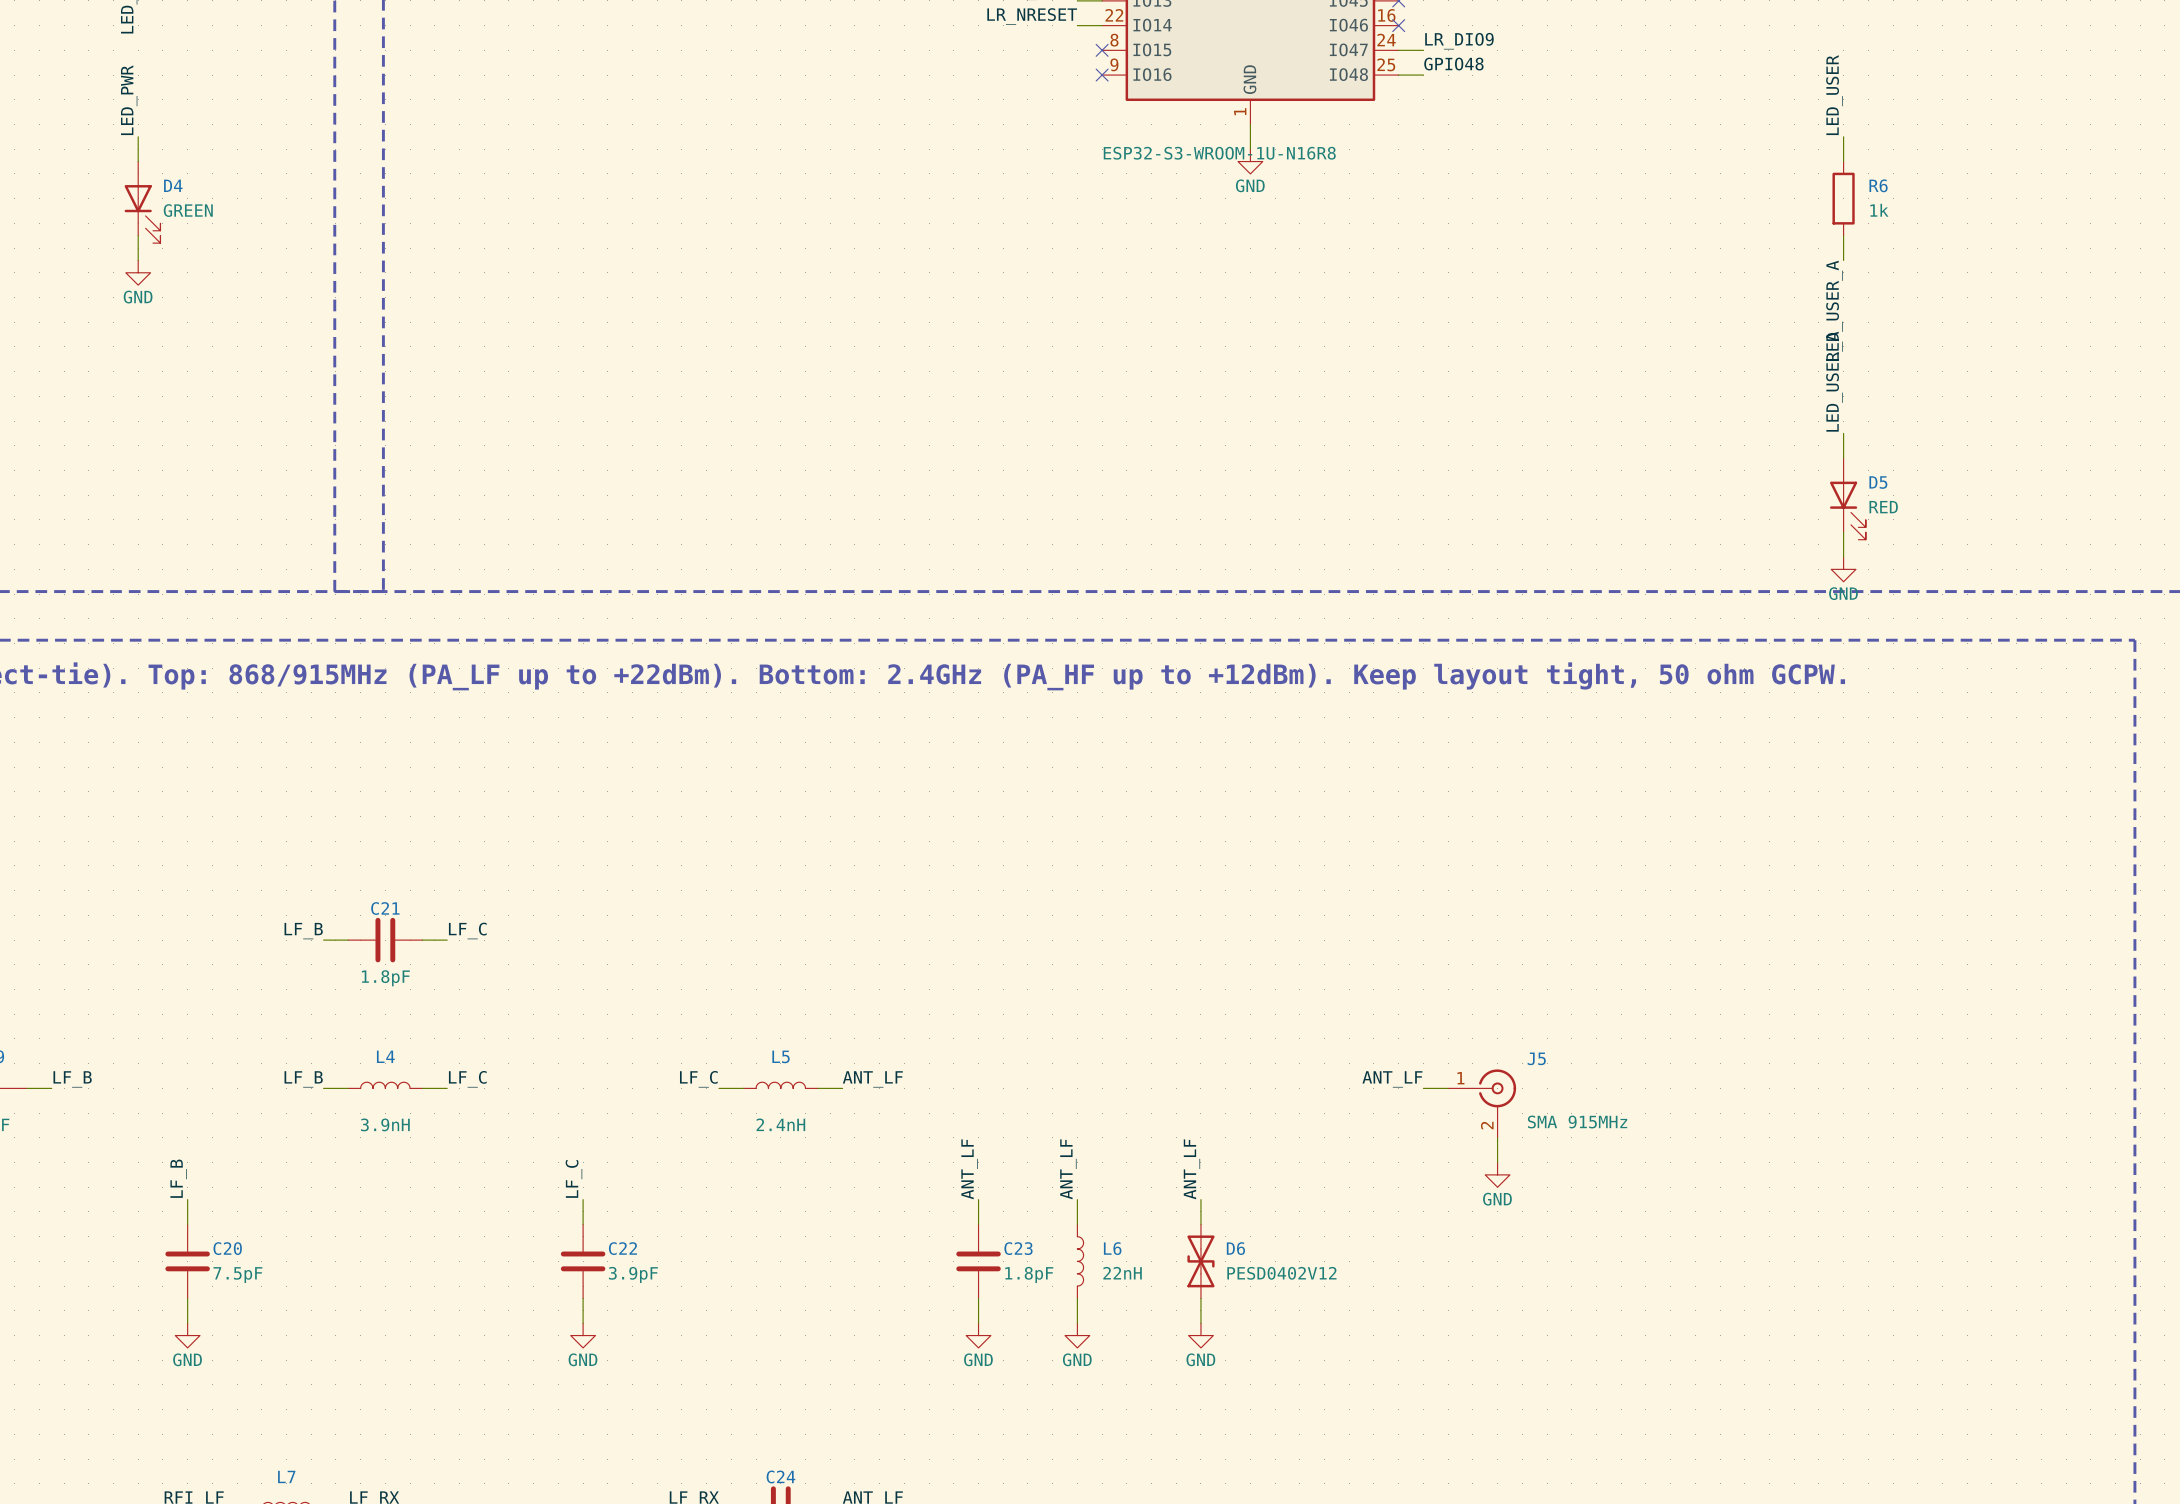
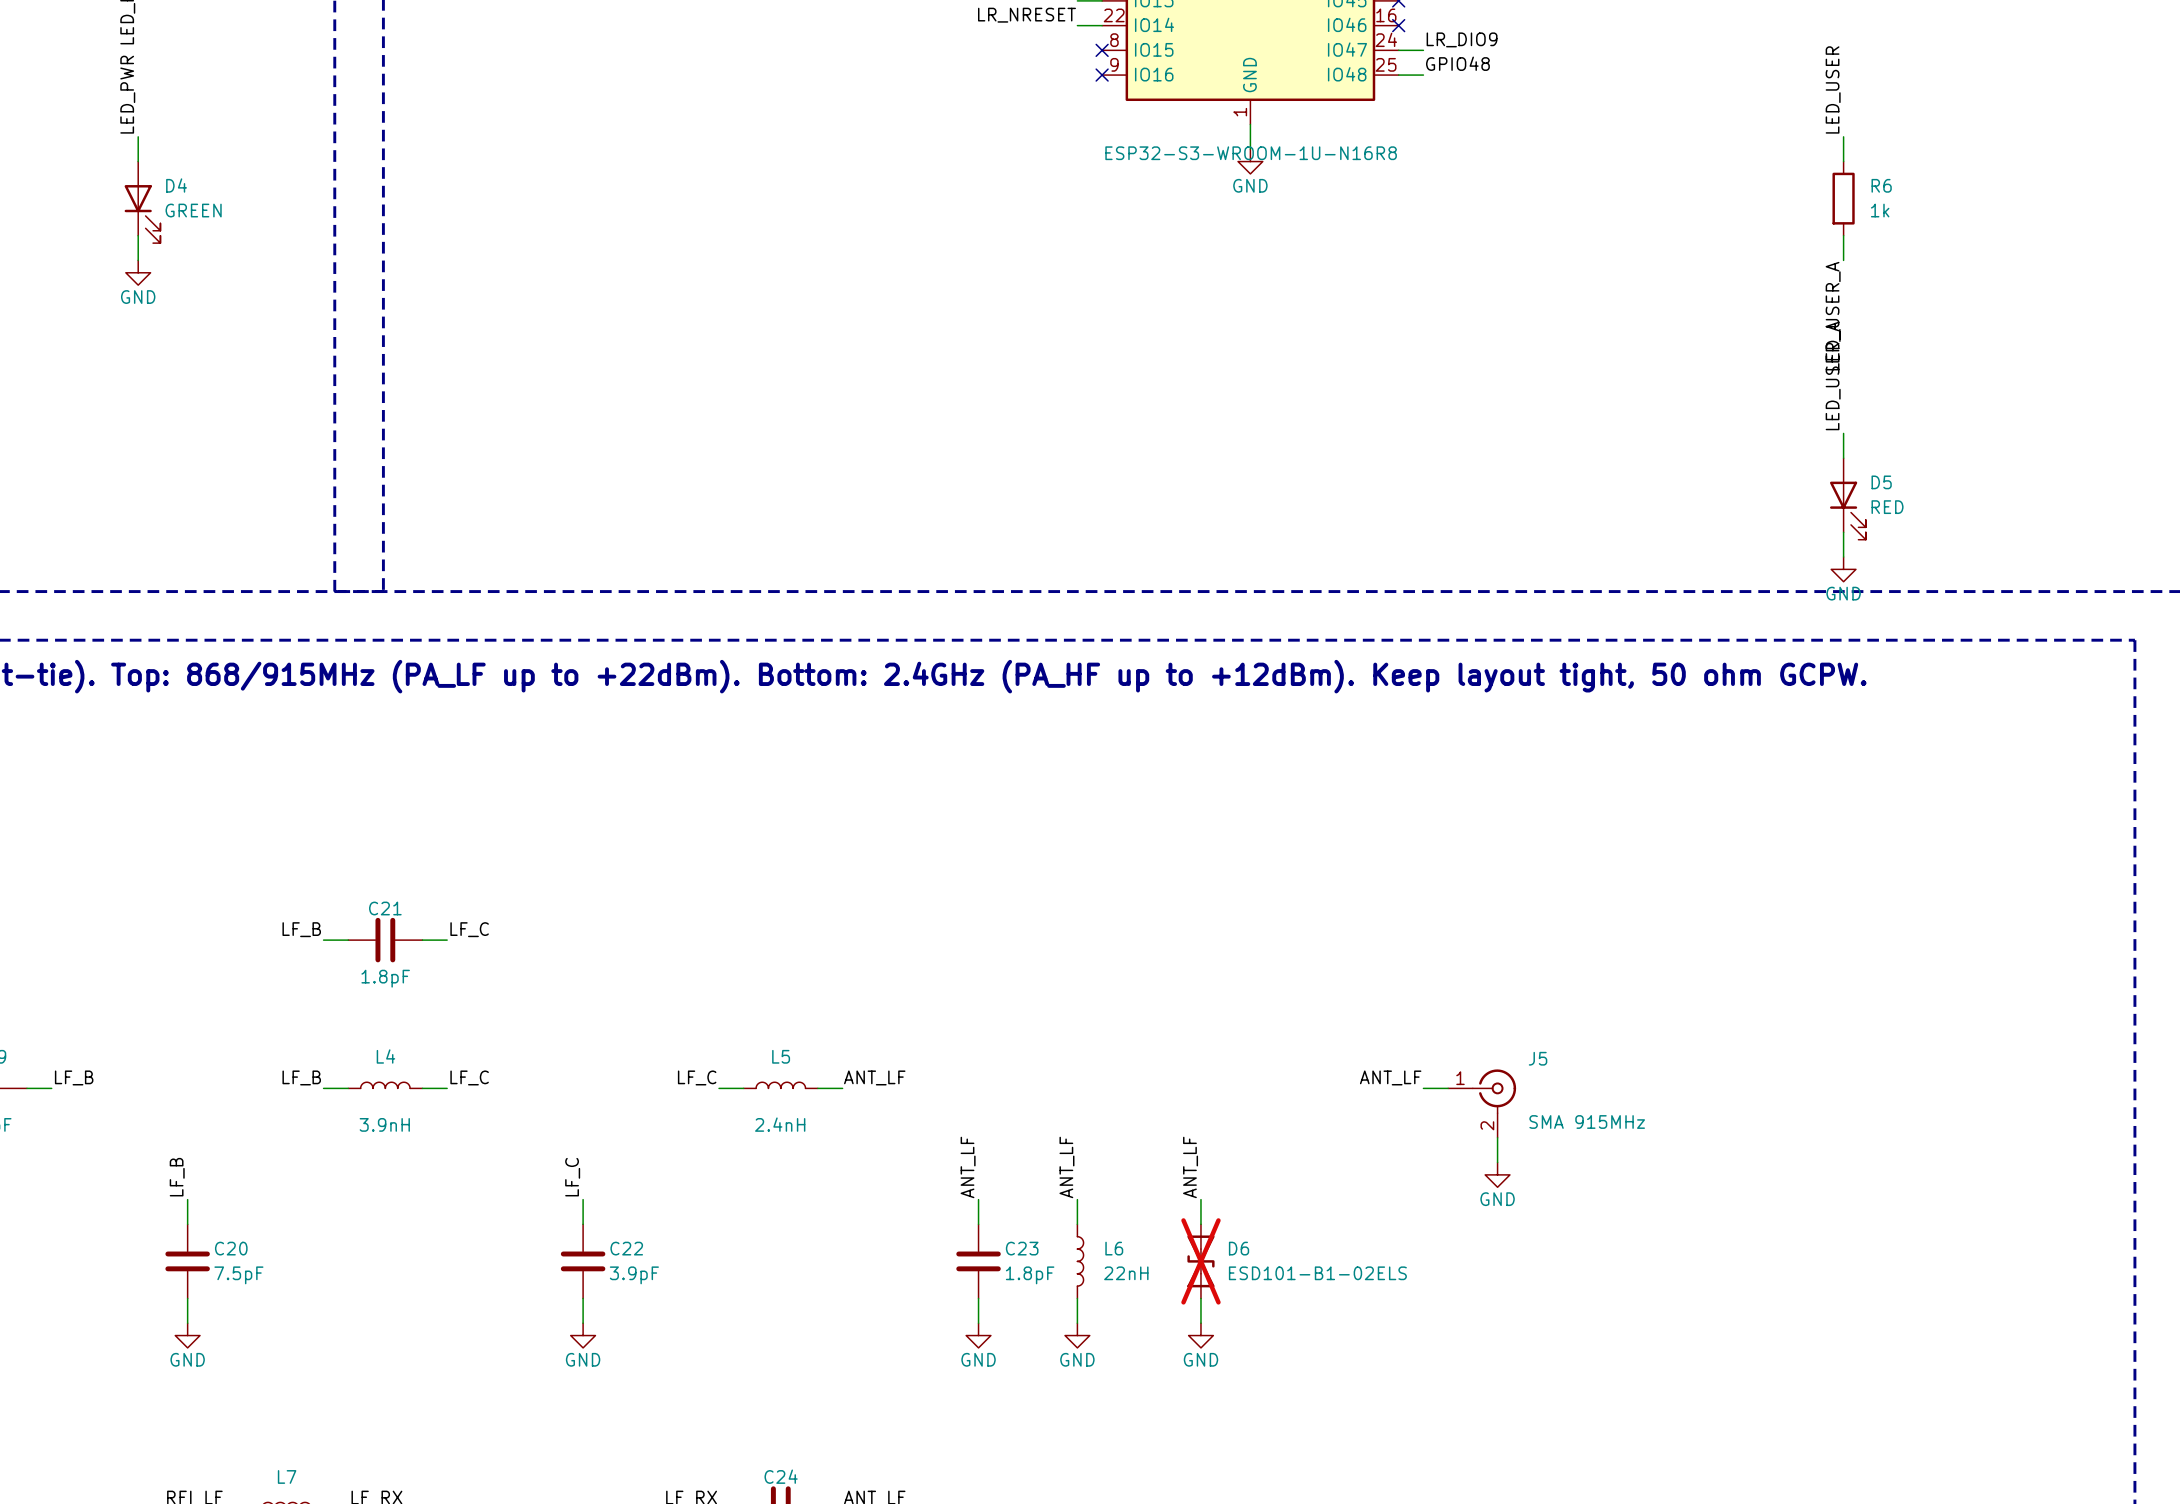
D6 do-not-place cross: none -> (1200, 1261)
D6 value: PESD0402V12 (1281, 1273) -> ESD101-B1-02ELS (1317, 1273)

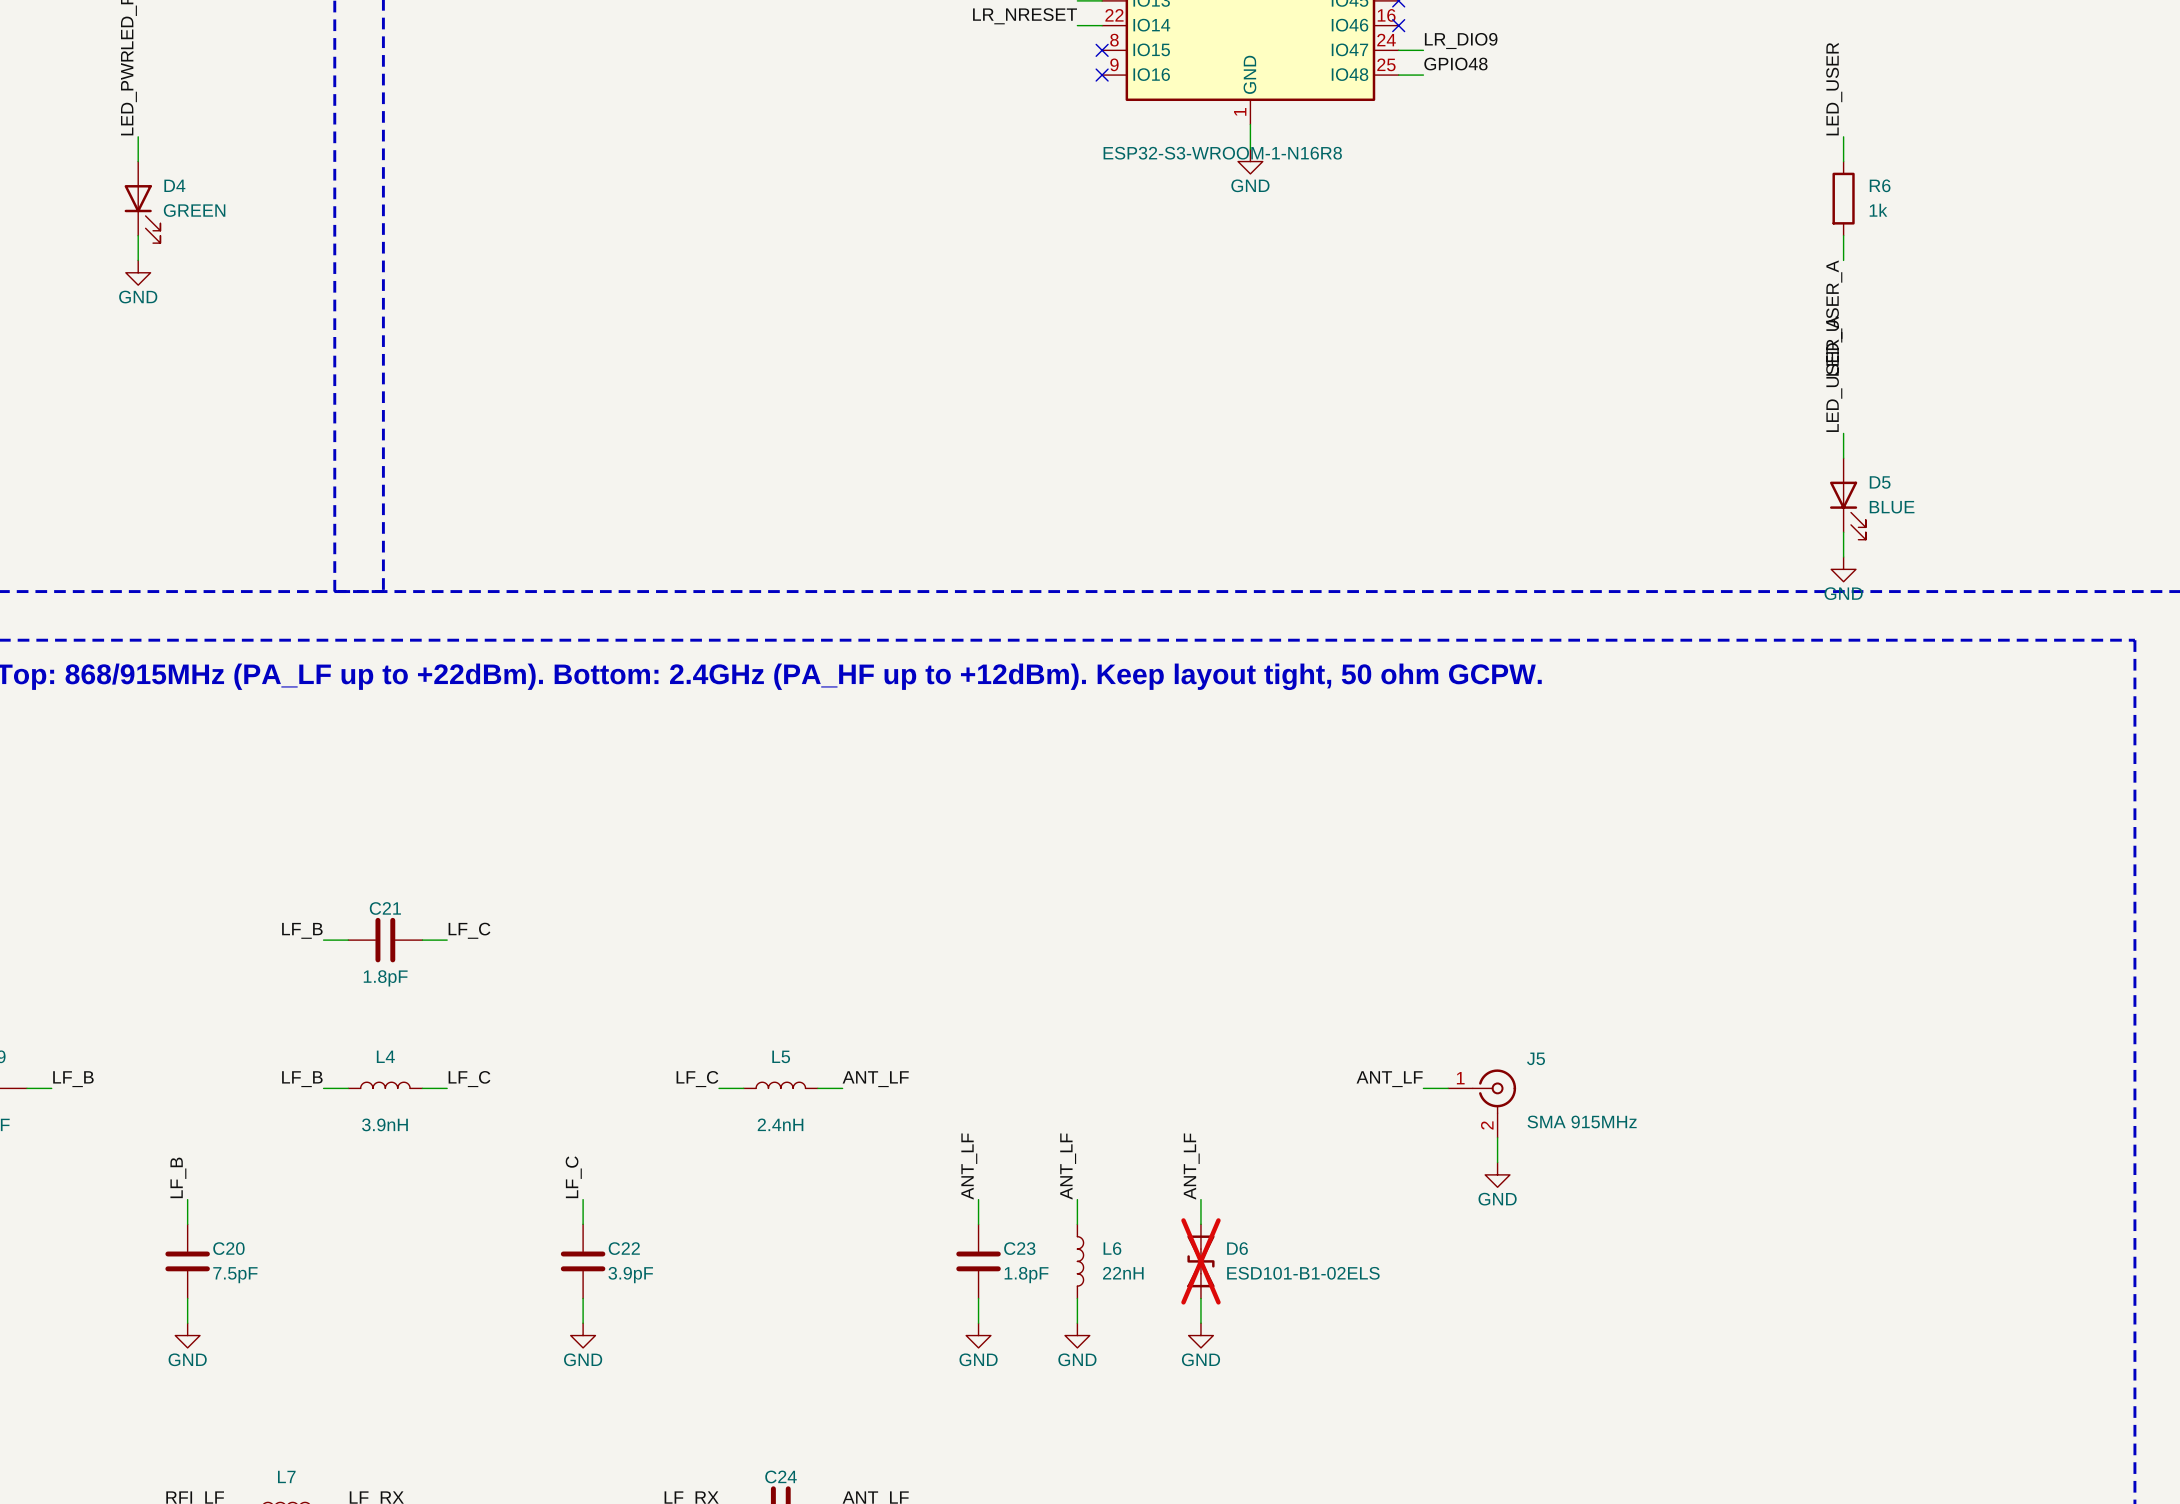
part value: ESP32-S3-WROOM-1U-N16R8 (1251, 153) -> ESP32-S3-WROOM-1-N16R8 (1222, 153)
D5 value: RED (1887, 507) -> BLUE (1892, 507)

